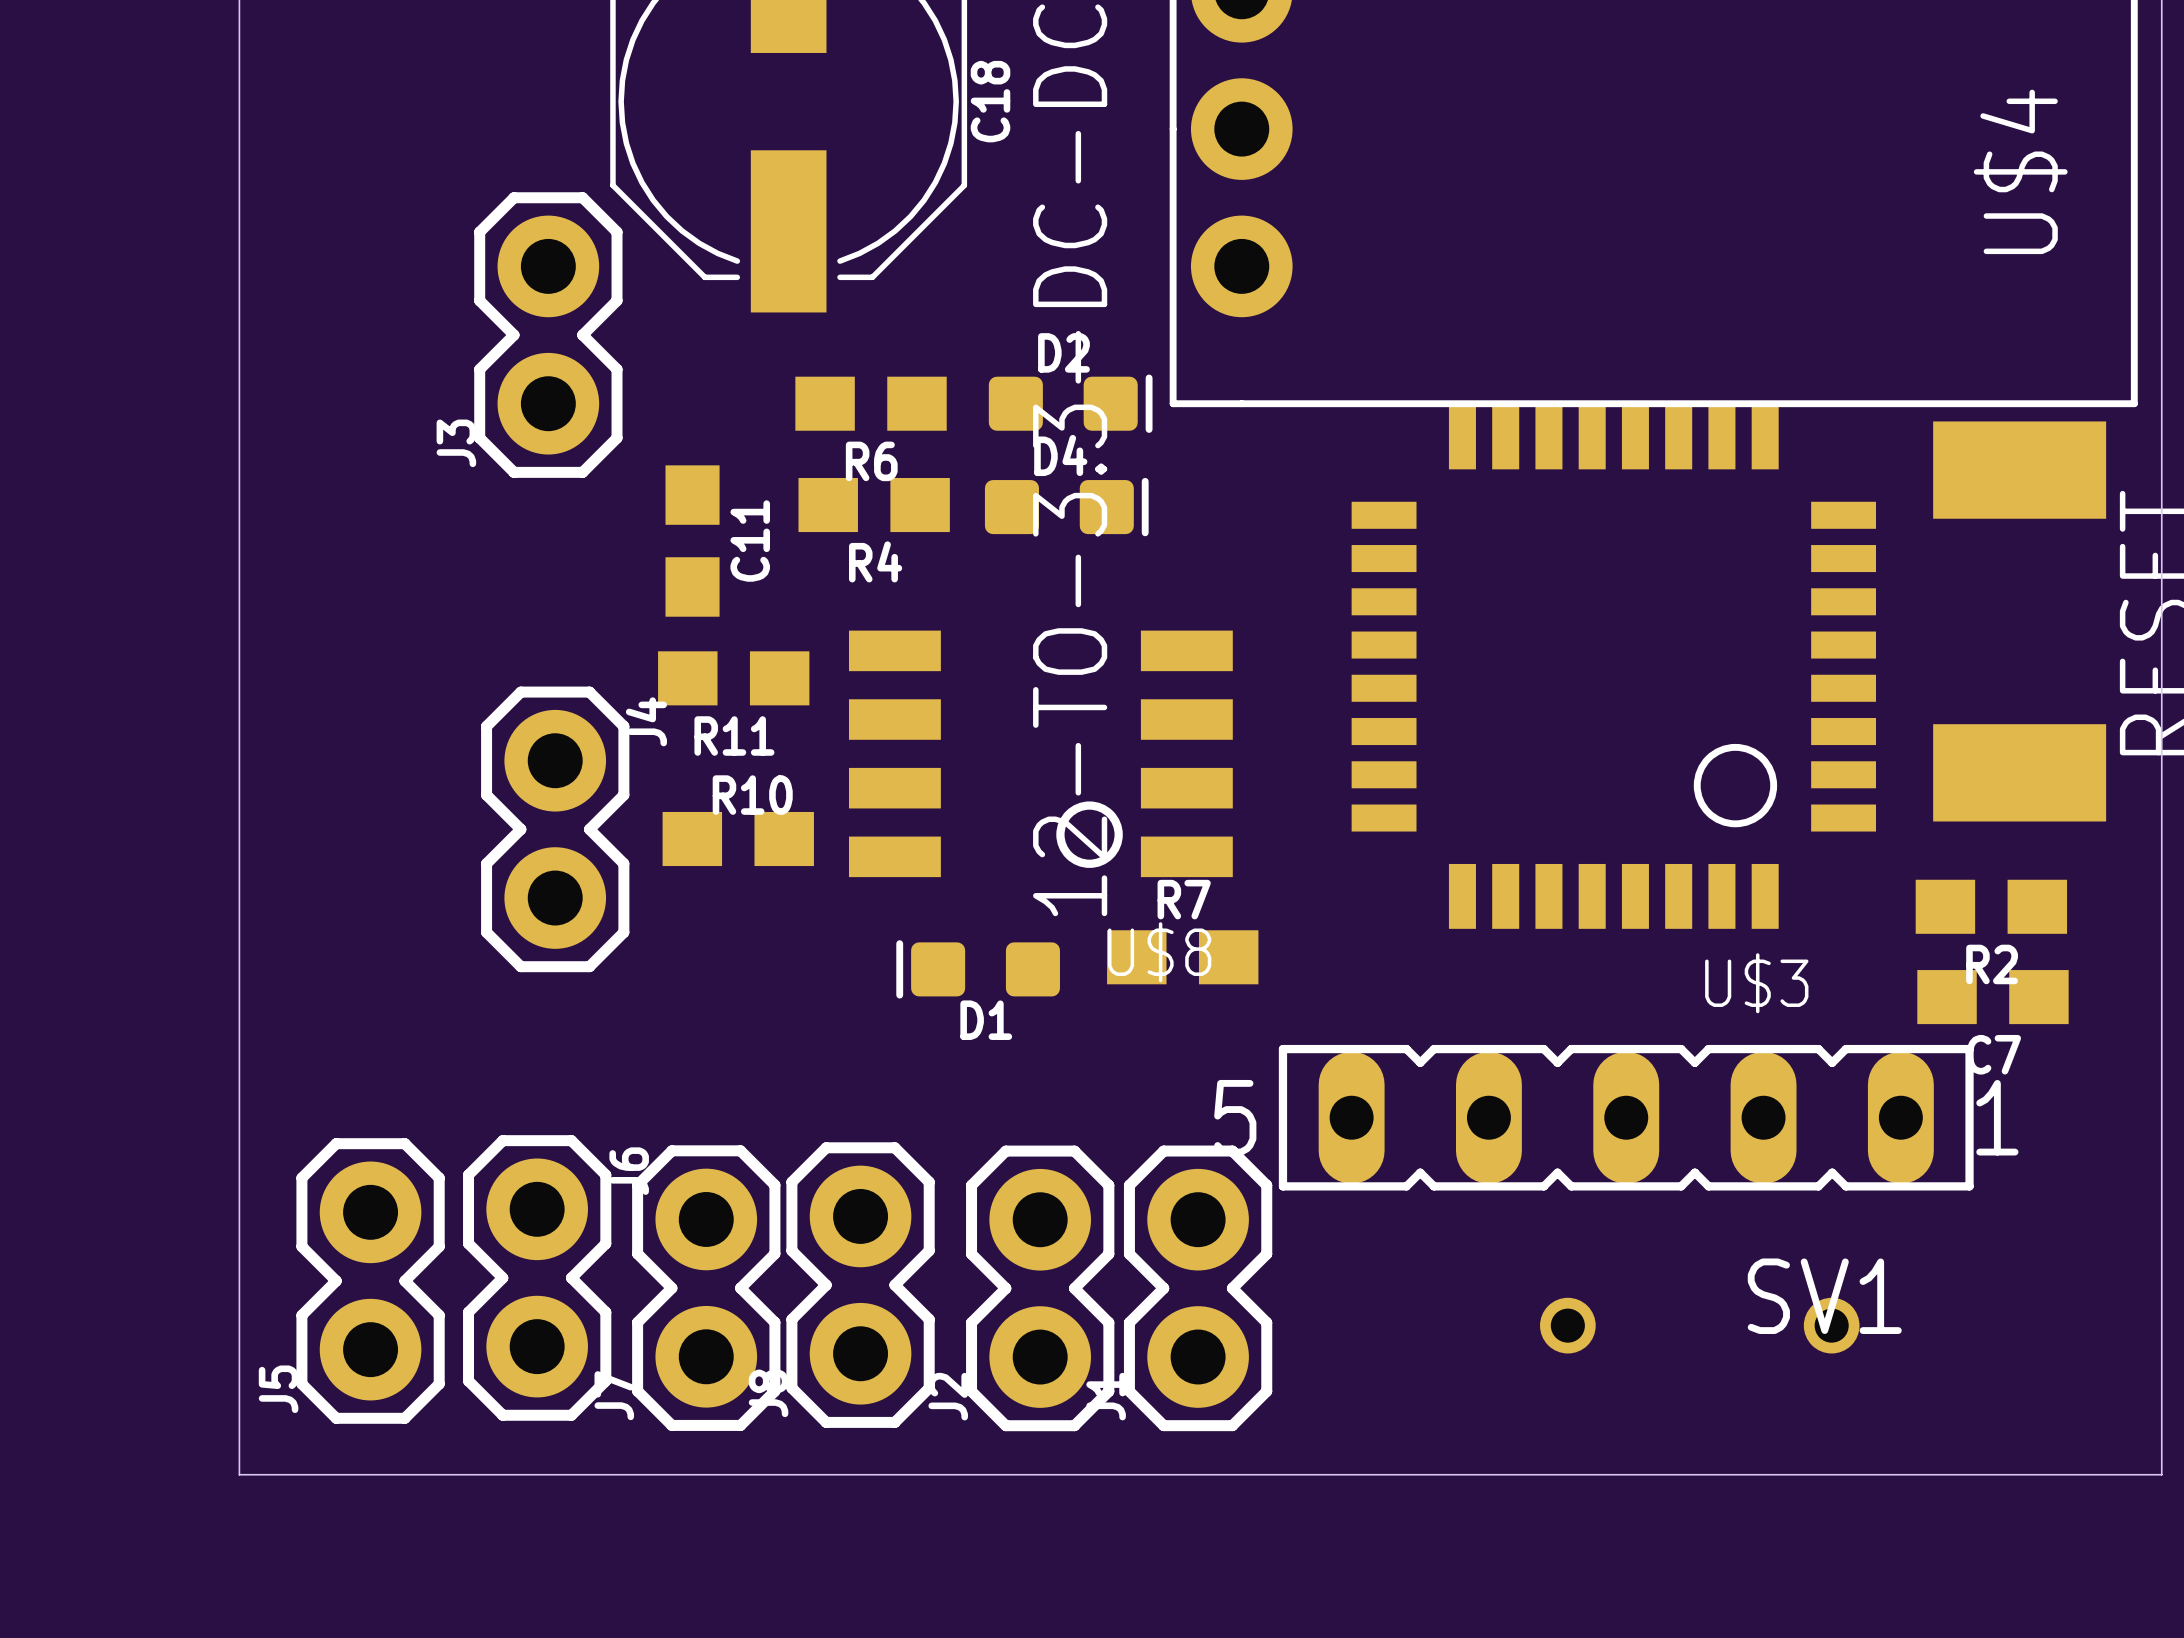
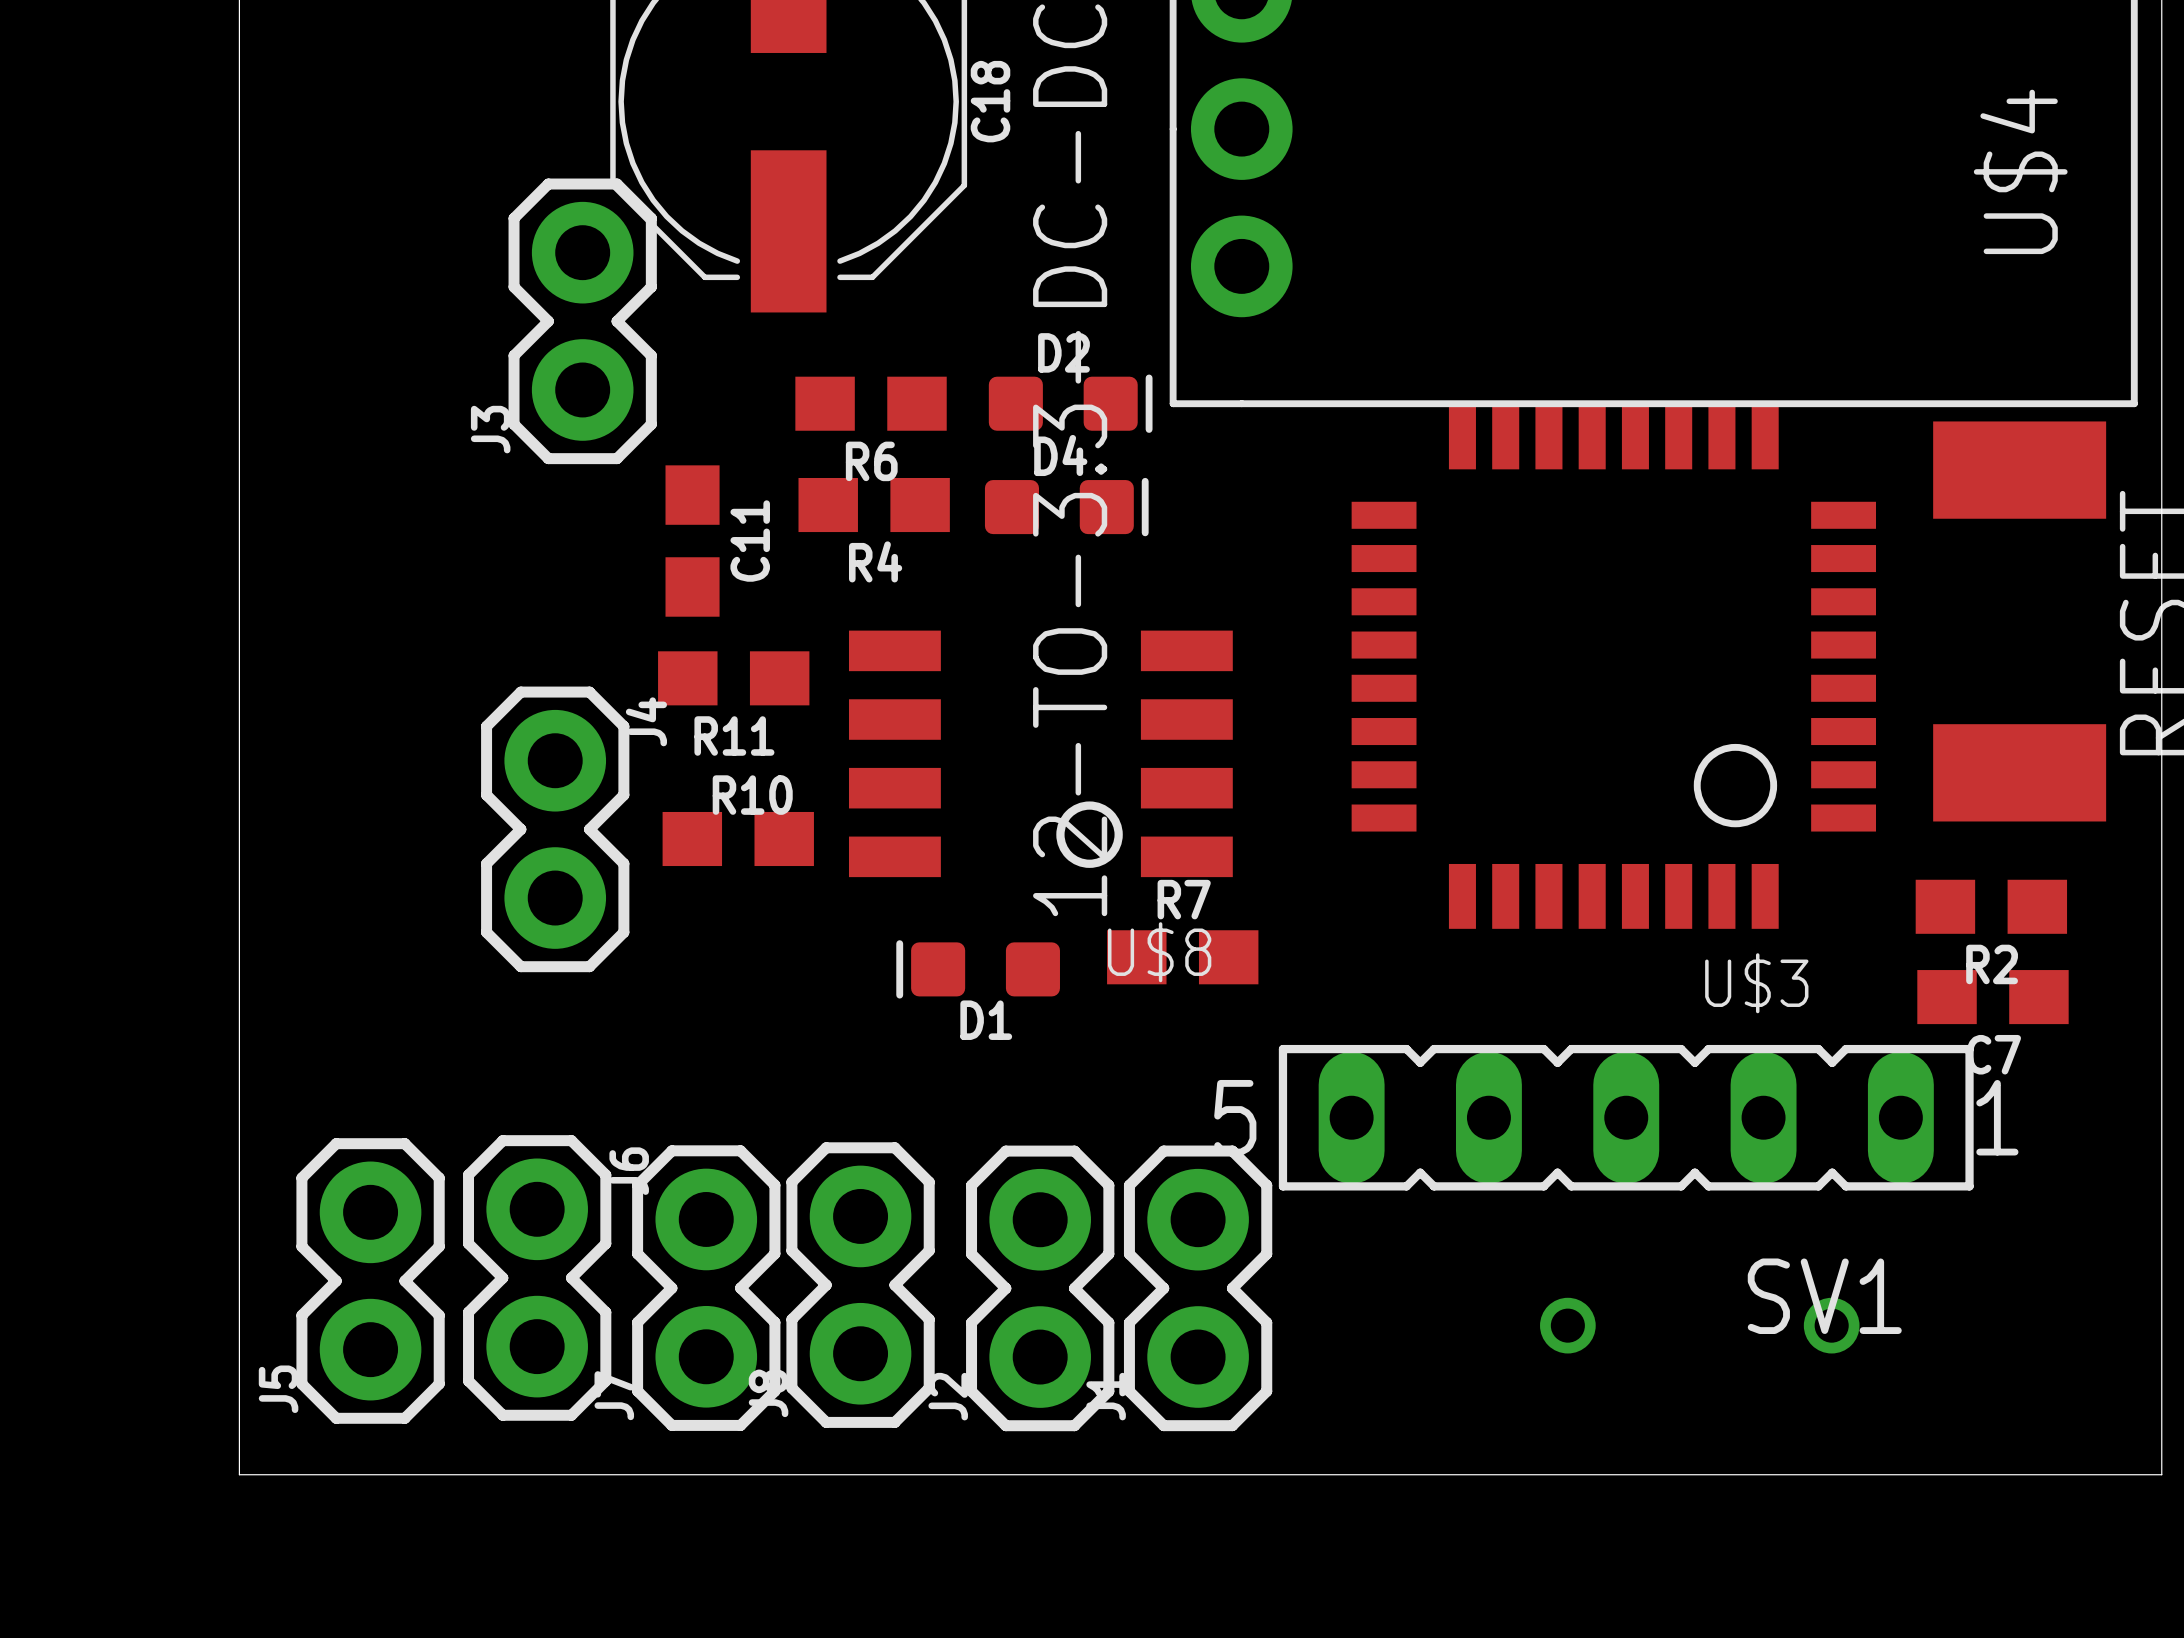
J3 position: (548, 335) -> (582, 321)

